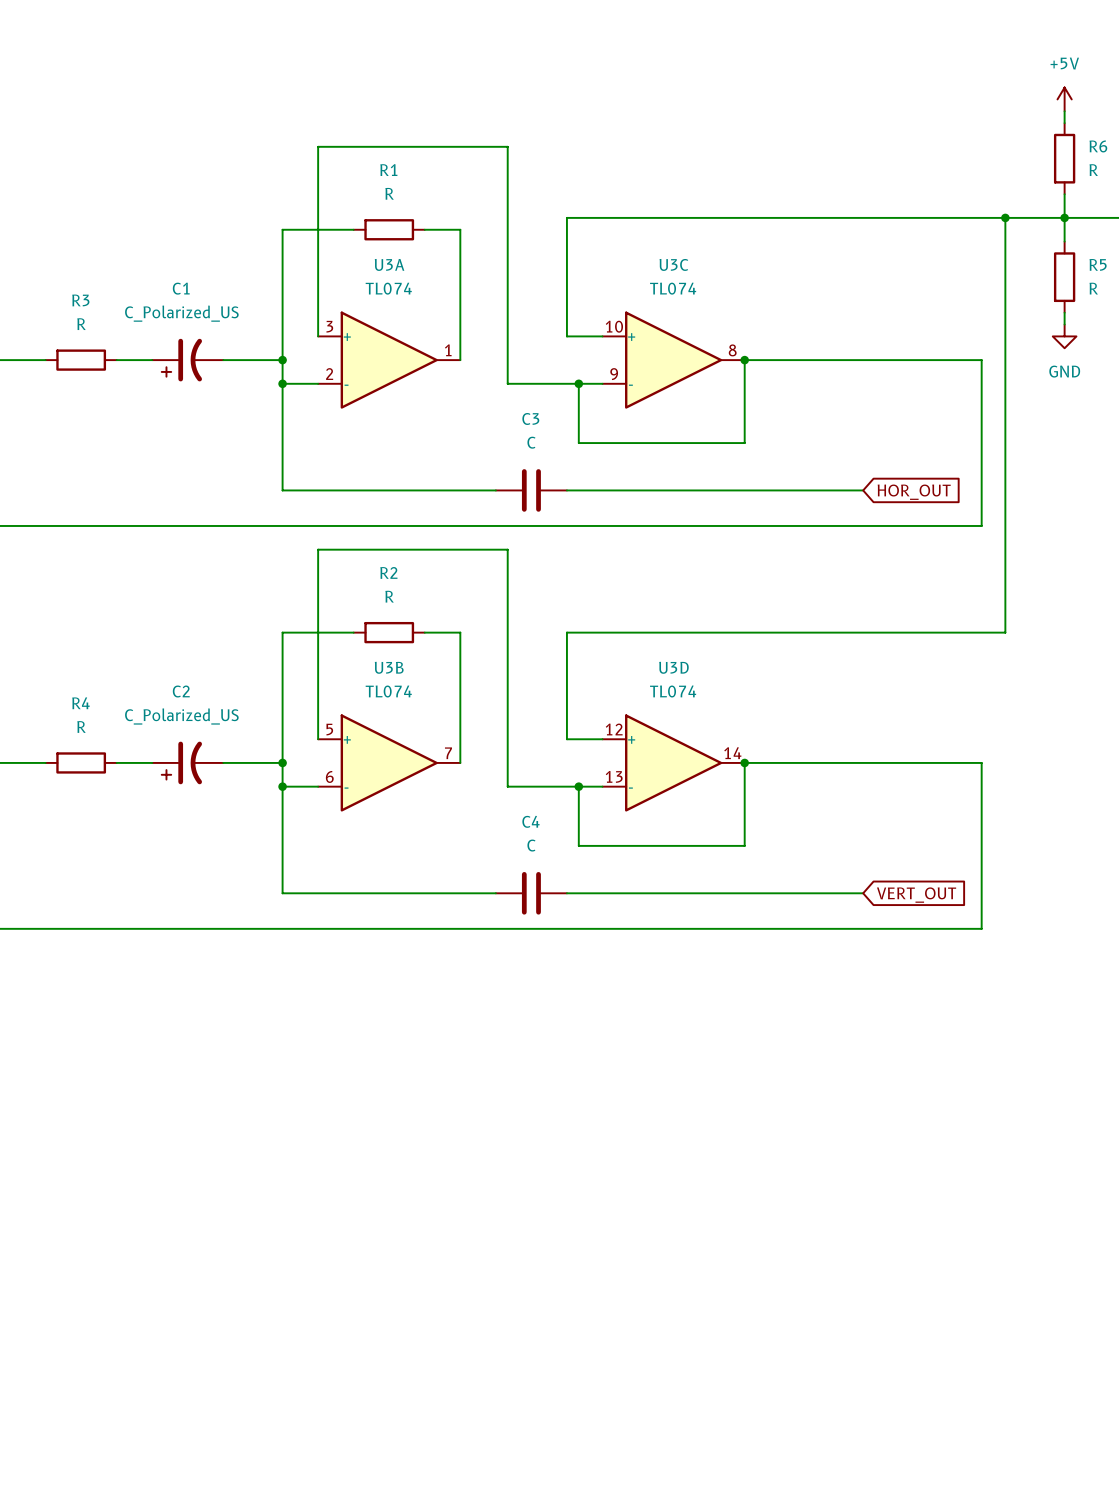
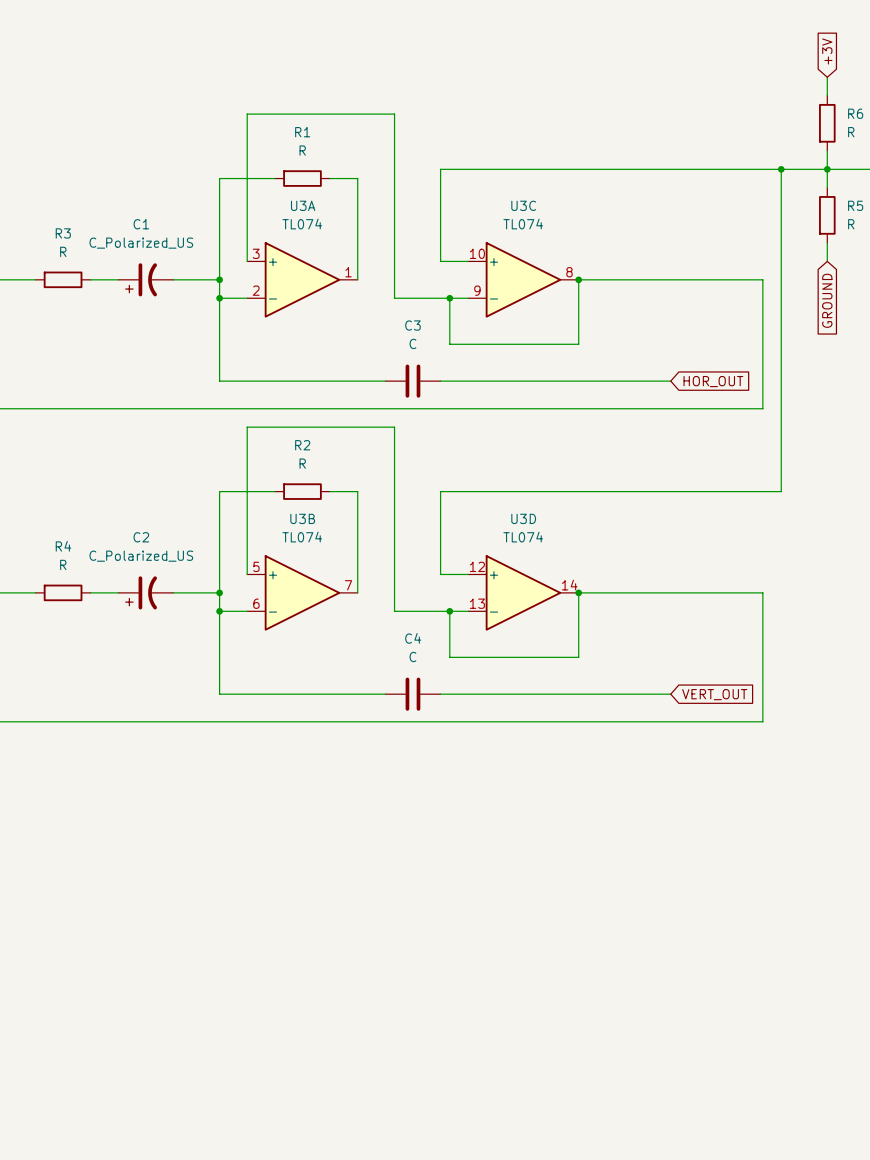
global label: none -> +3V (827, 51)
power symbol: +5V (1064, 99) -> none
power symbol: GND (1064, 336) -> none
global label: none -> GROUND (827, 300)

